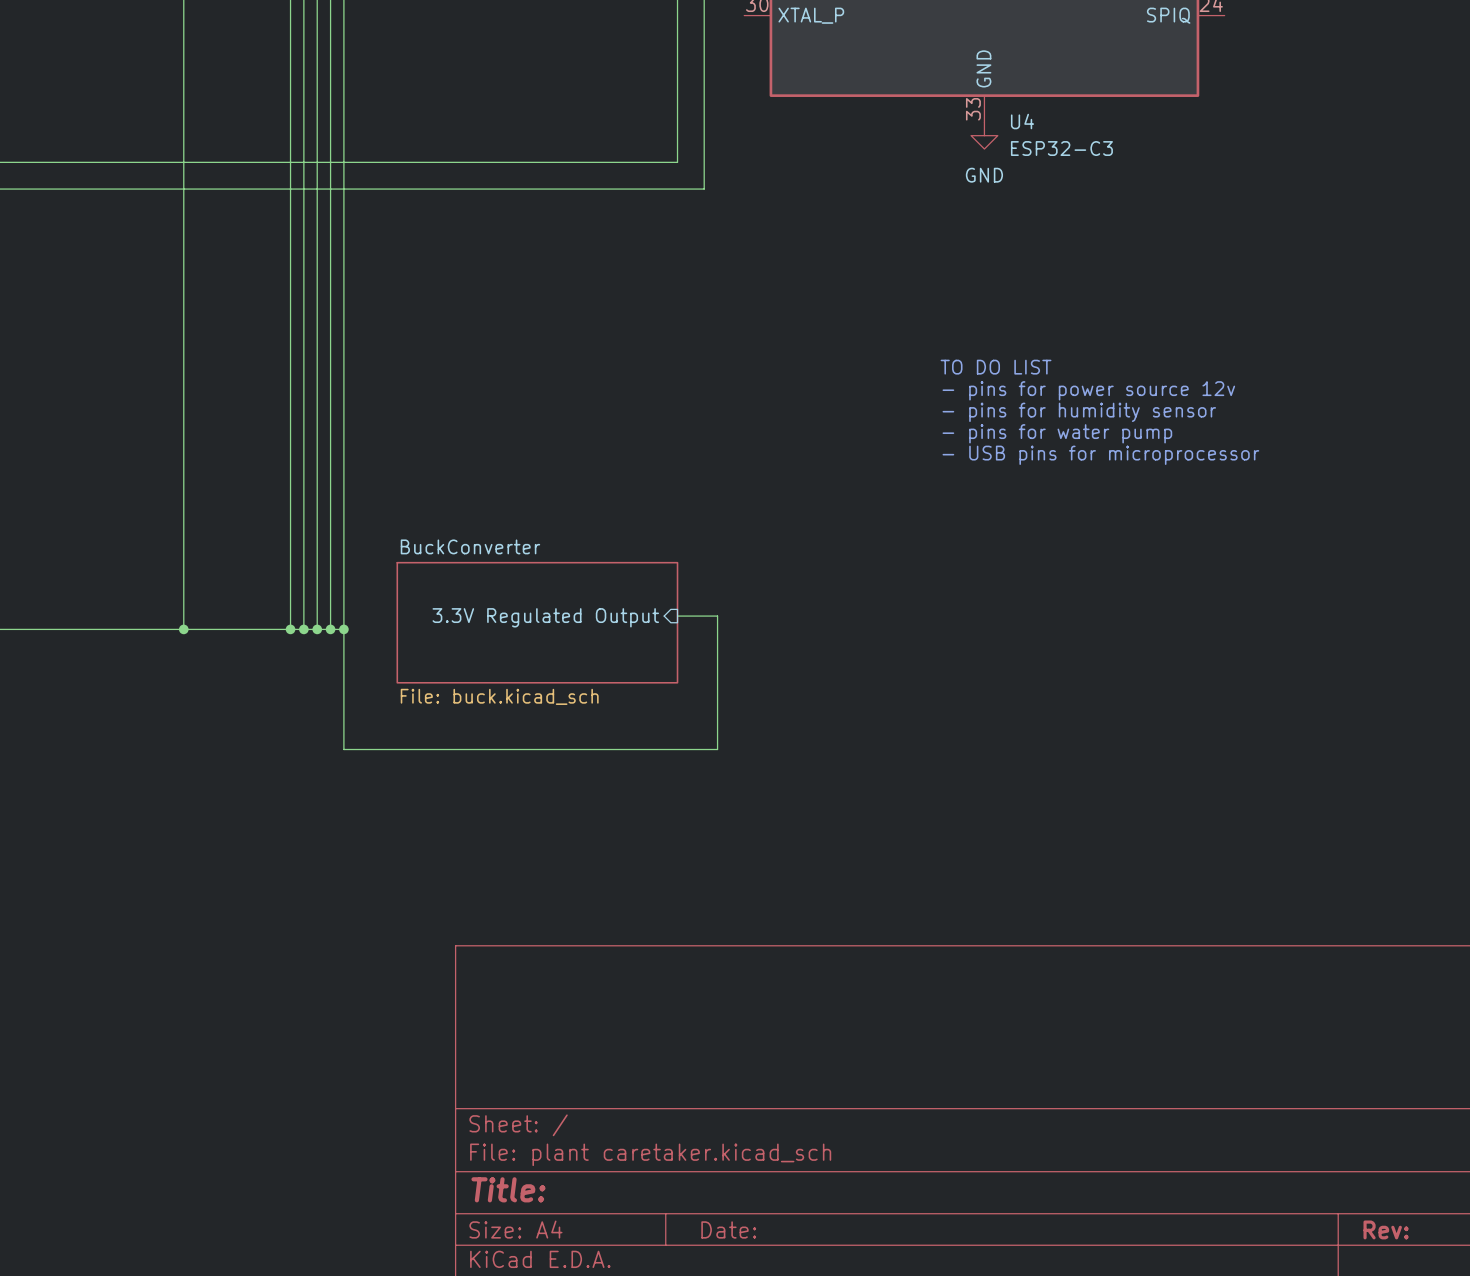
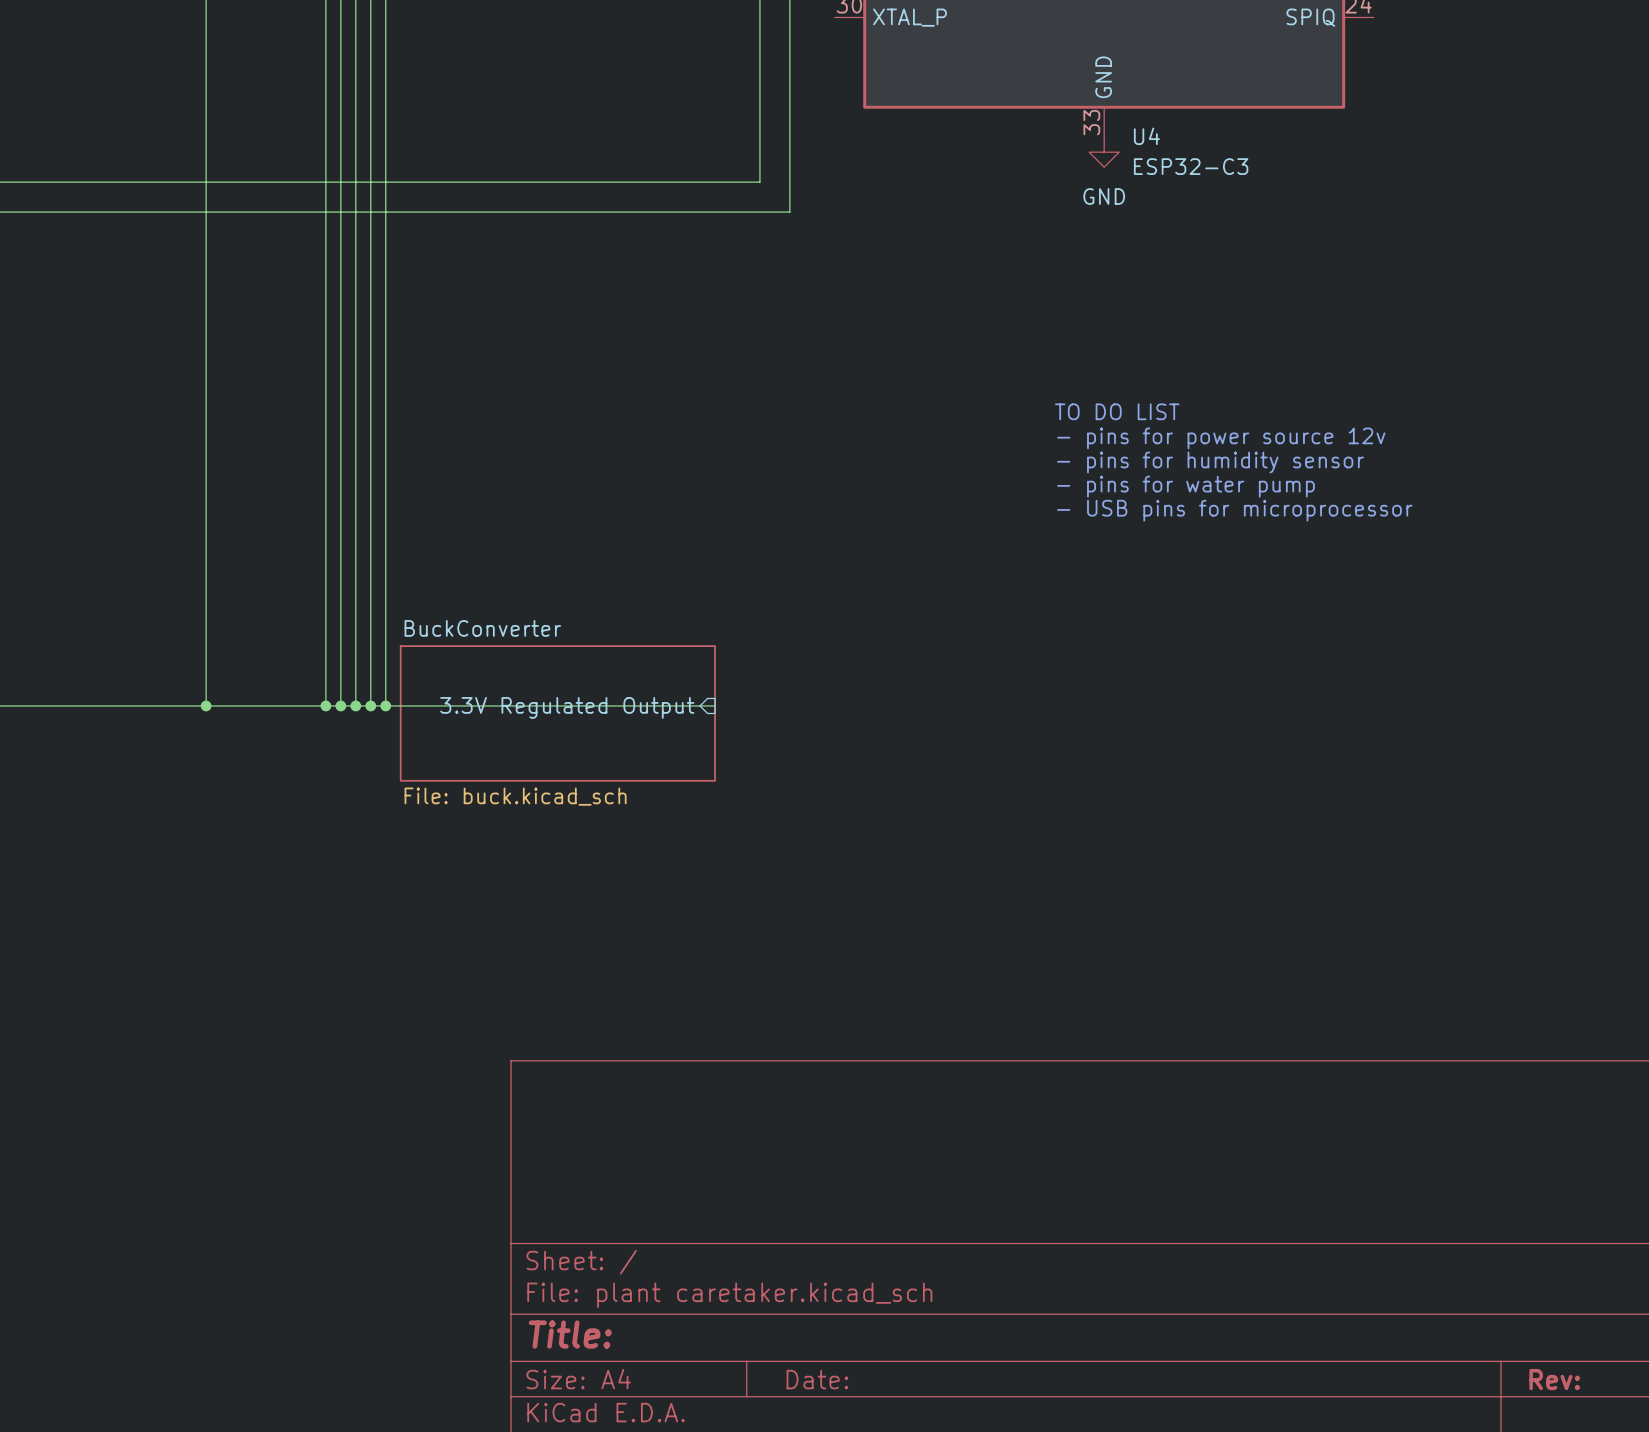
wire: (677, 616) (717, 616) (717, 749) (343, 749) (343, 629) -> (715, 705) (385, 705)
sheet pin position: 3.3V Regulated Output (545, 617) -> 3.3V Regulated Output (567, 707)
sheet BuckConverter position: (537, 622) -> (557, 713)

